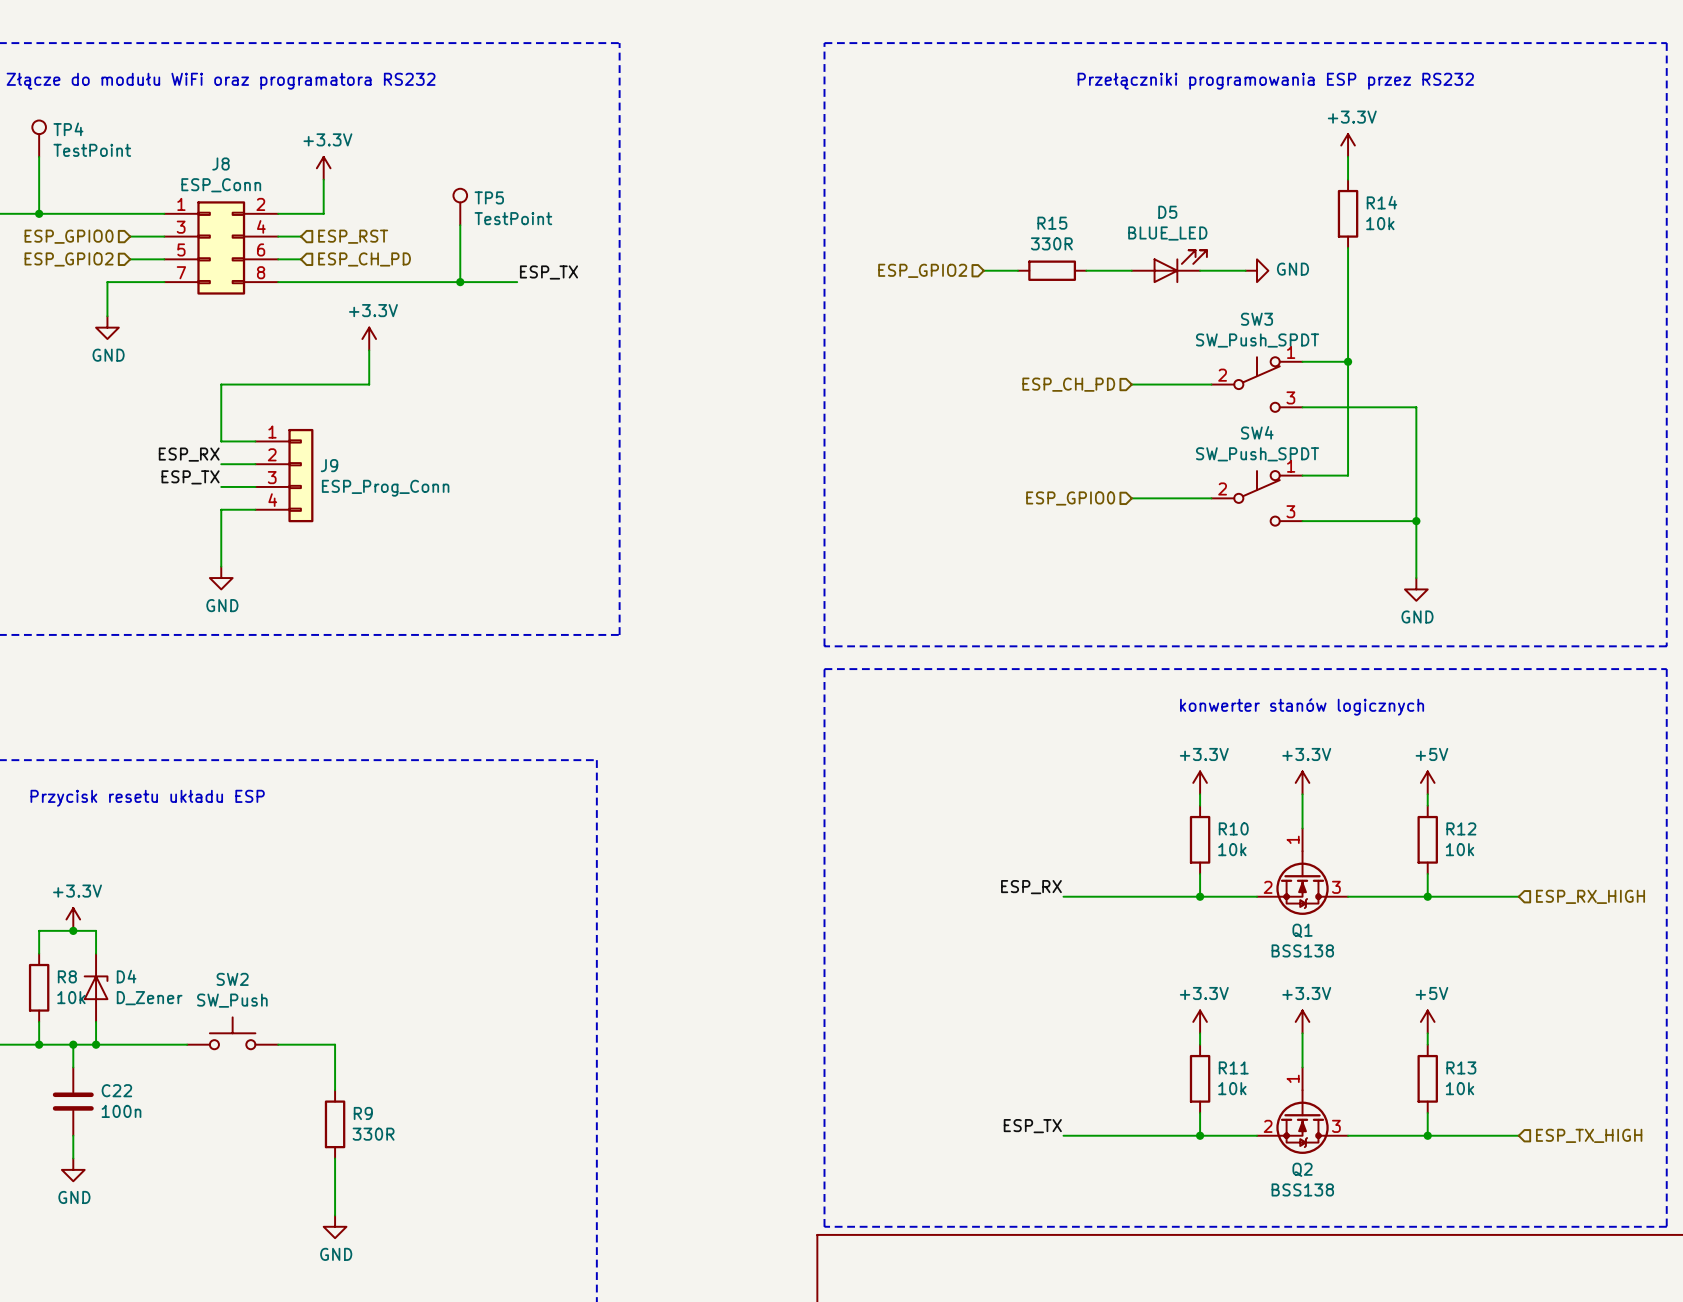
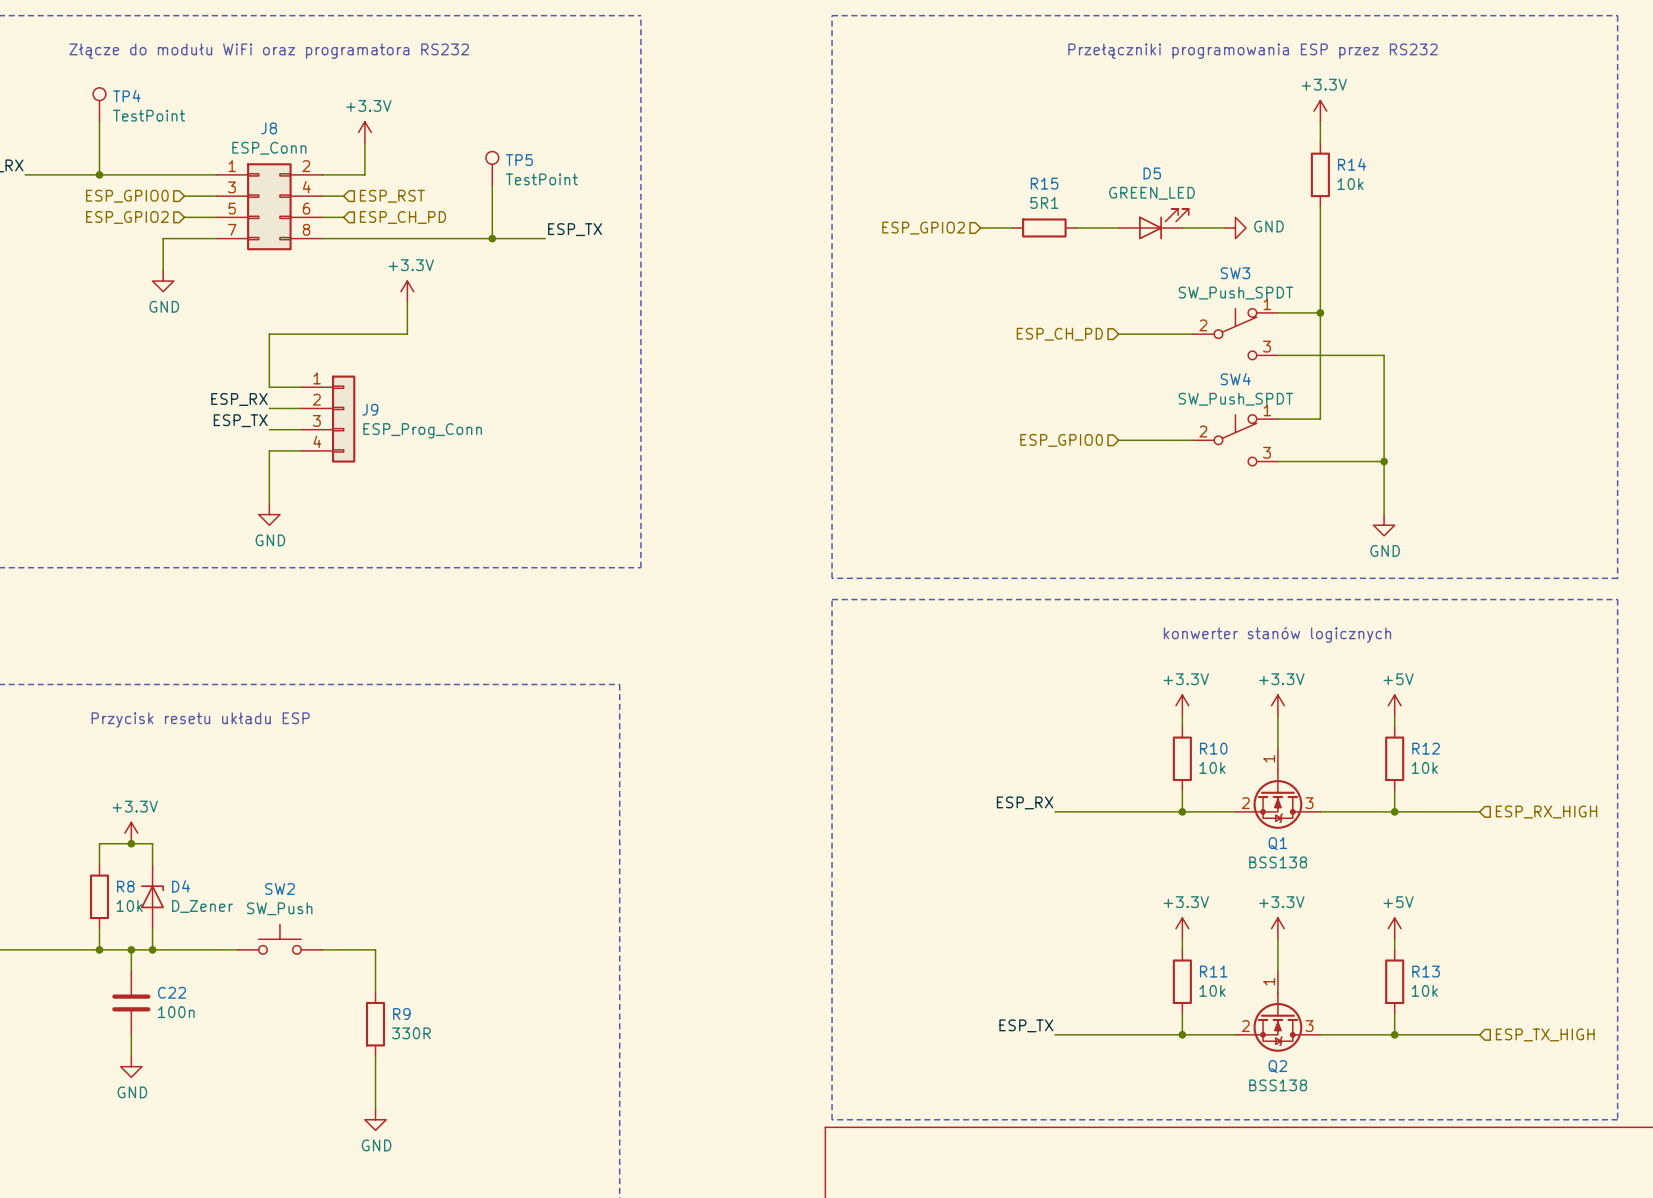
D5 value: BLUE_LED (1167, 233) -> GREEN_LED (1152, 193)
R15 value: 330R (1051, 243) -> 5R1 (1044, 202)

